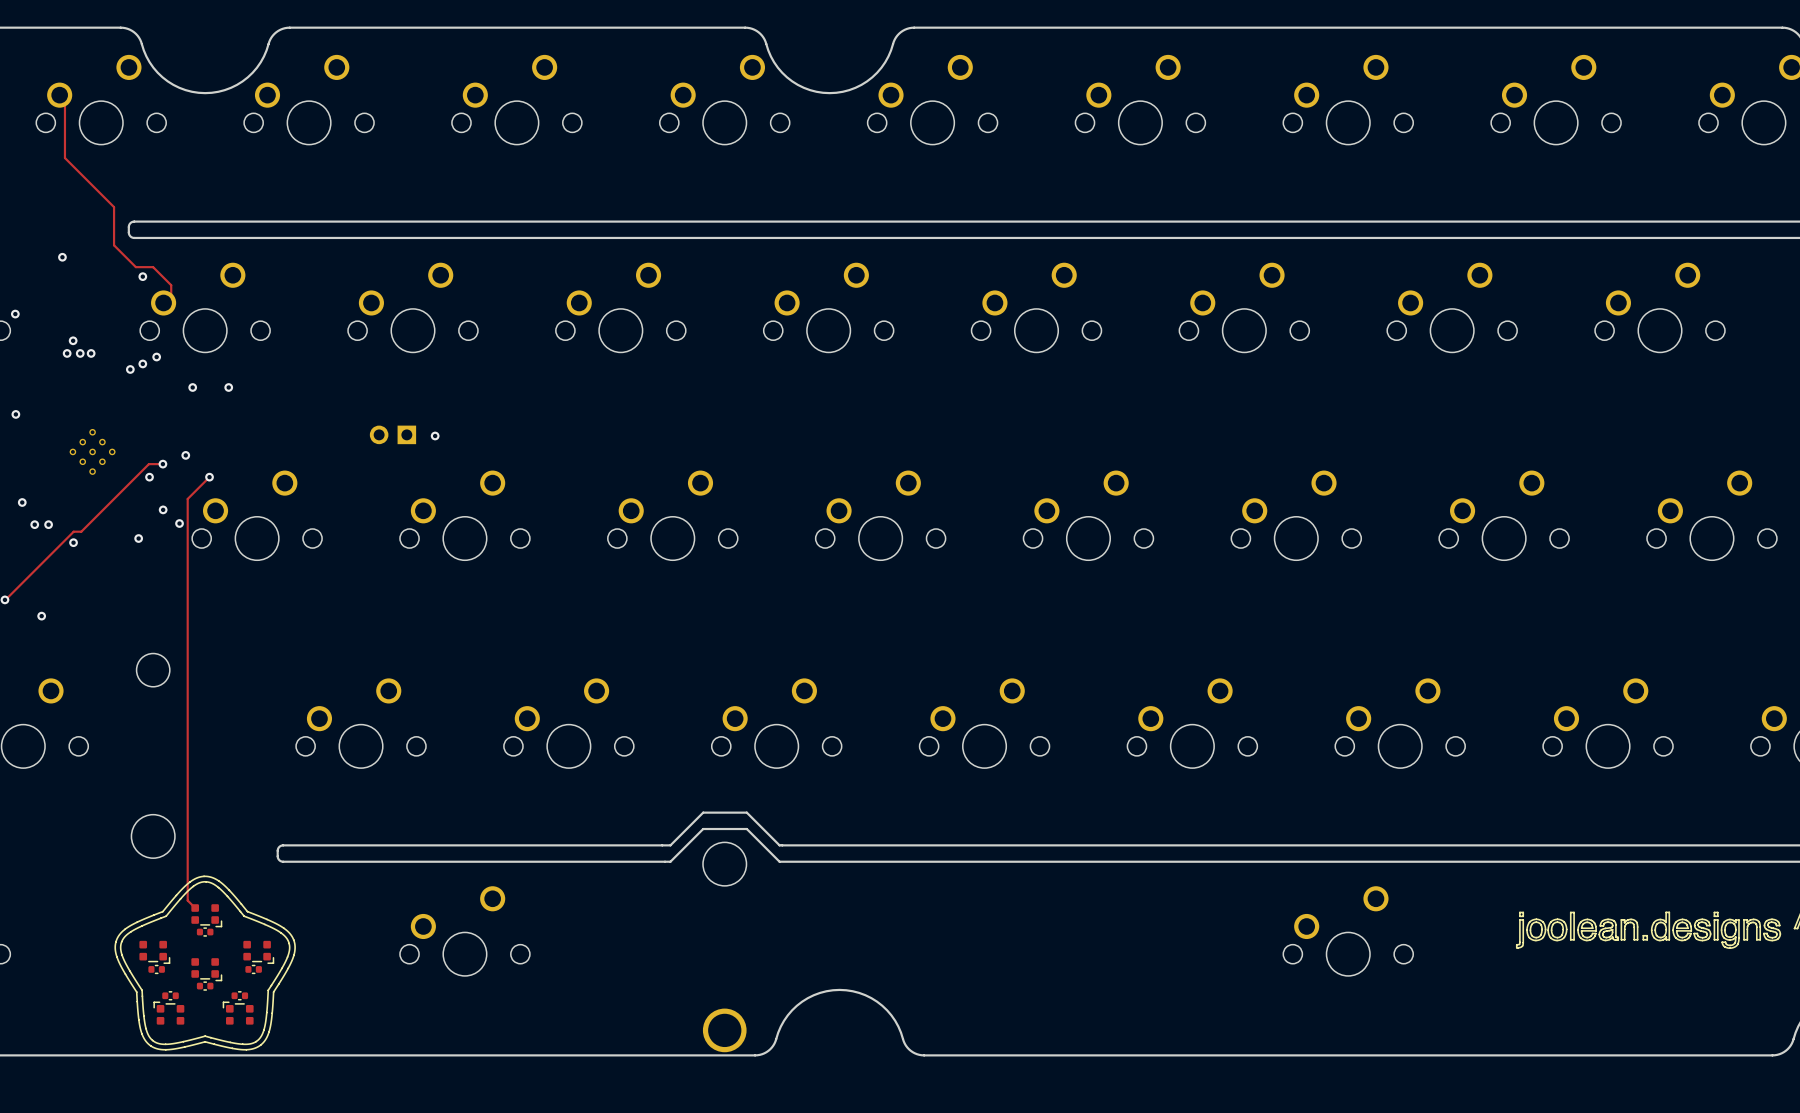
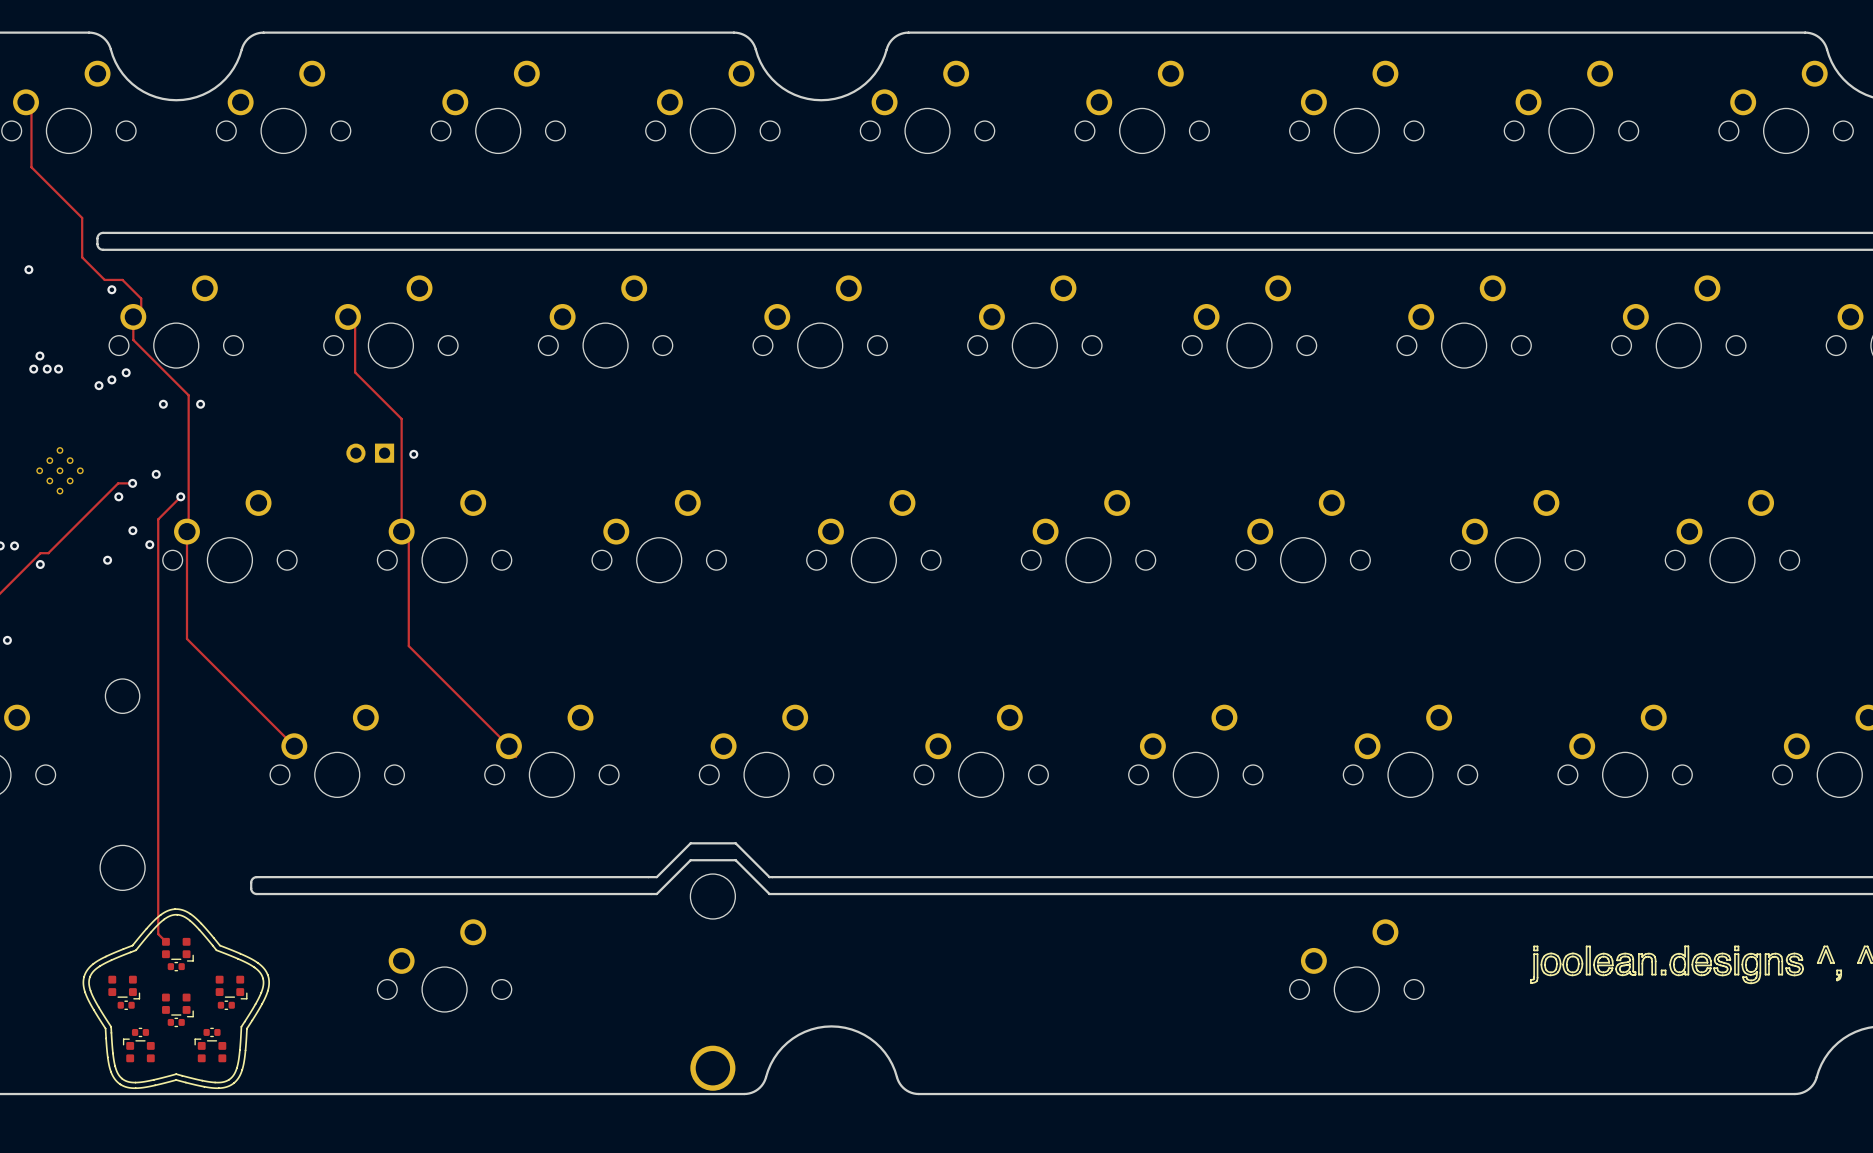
track: none -> (133, 316) (133, 339) (188, 395) (186, 638) (294, 746)
track: none -> (347, 316) (355, 324) (355, 372) (401, 418) (401, 531) (408, 538) (408, 646) (516, 753) (516, 756)

